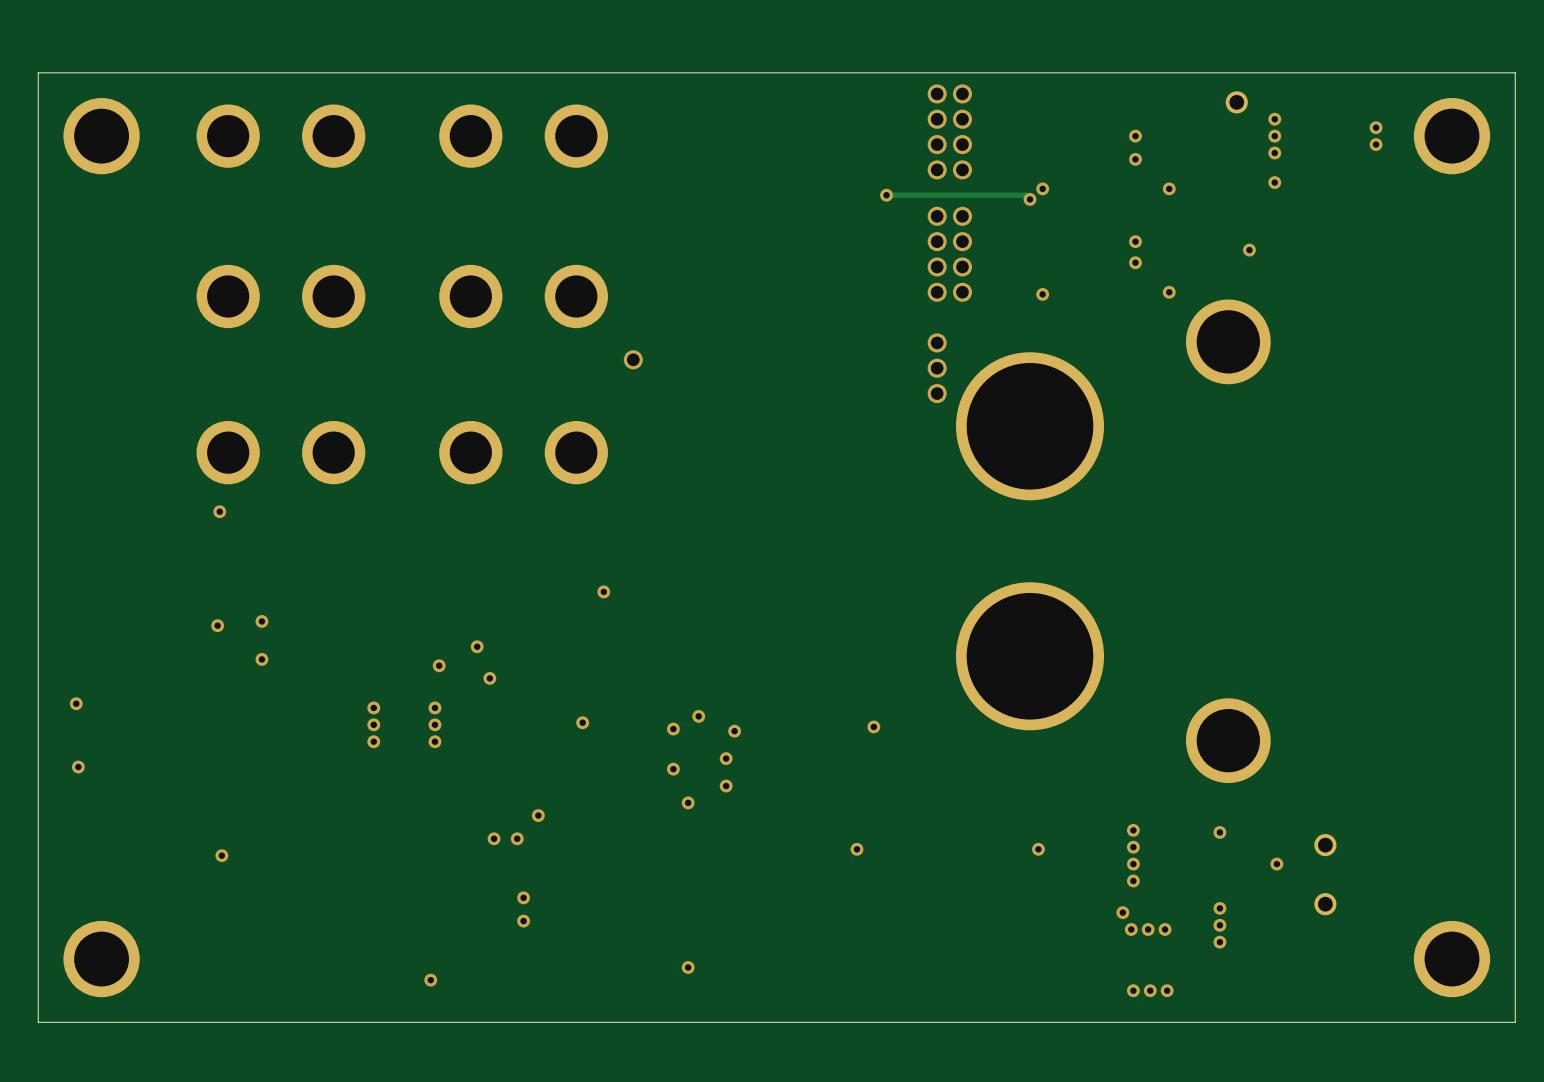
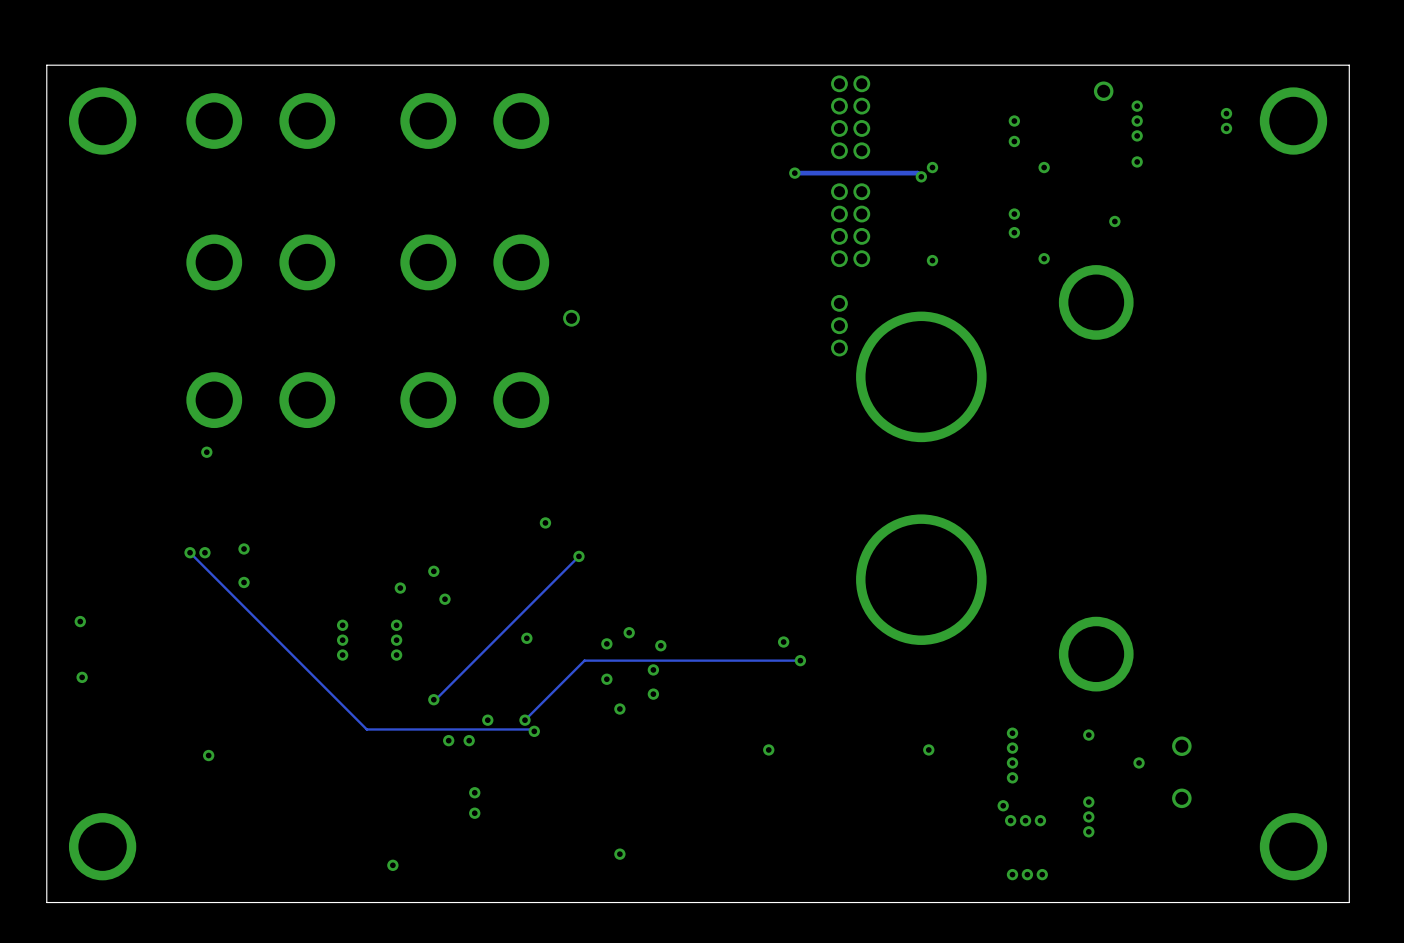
track: none -> (190, 552) (366, 729) (532, 729) (534, 731)
via: none -> (190, 552)
track: none -> (578, 556) (433, 699)
via: none -> (578, 556)
track: none -> (800, 660) (584, 660) (524, 720)
via: none -> (800, 660)
via: none -> (433, 699)
via: none -> (524, 720)
via: none -> (534, 731)

